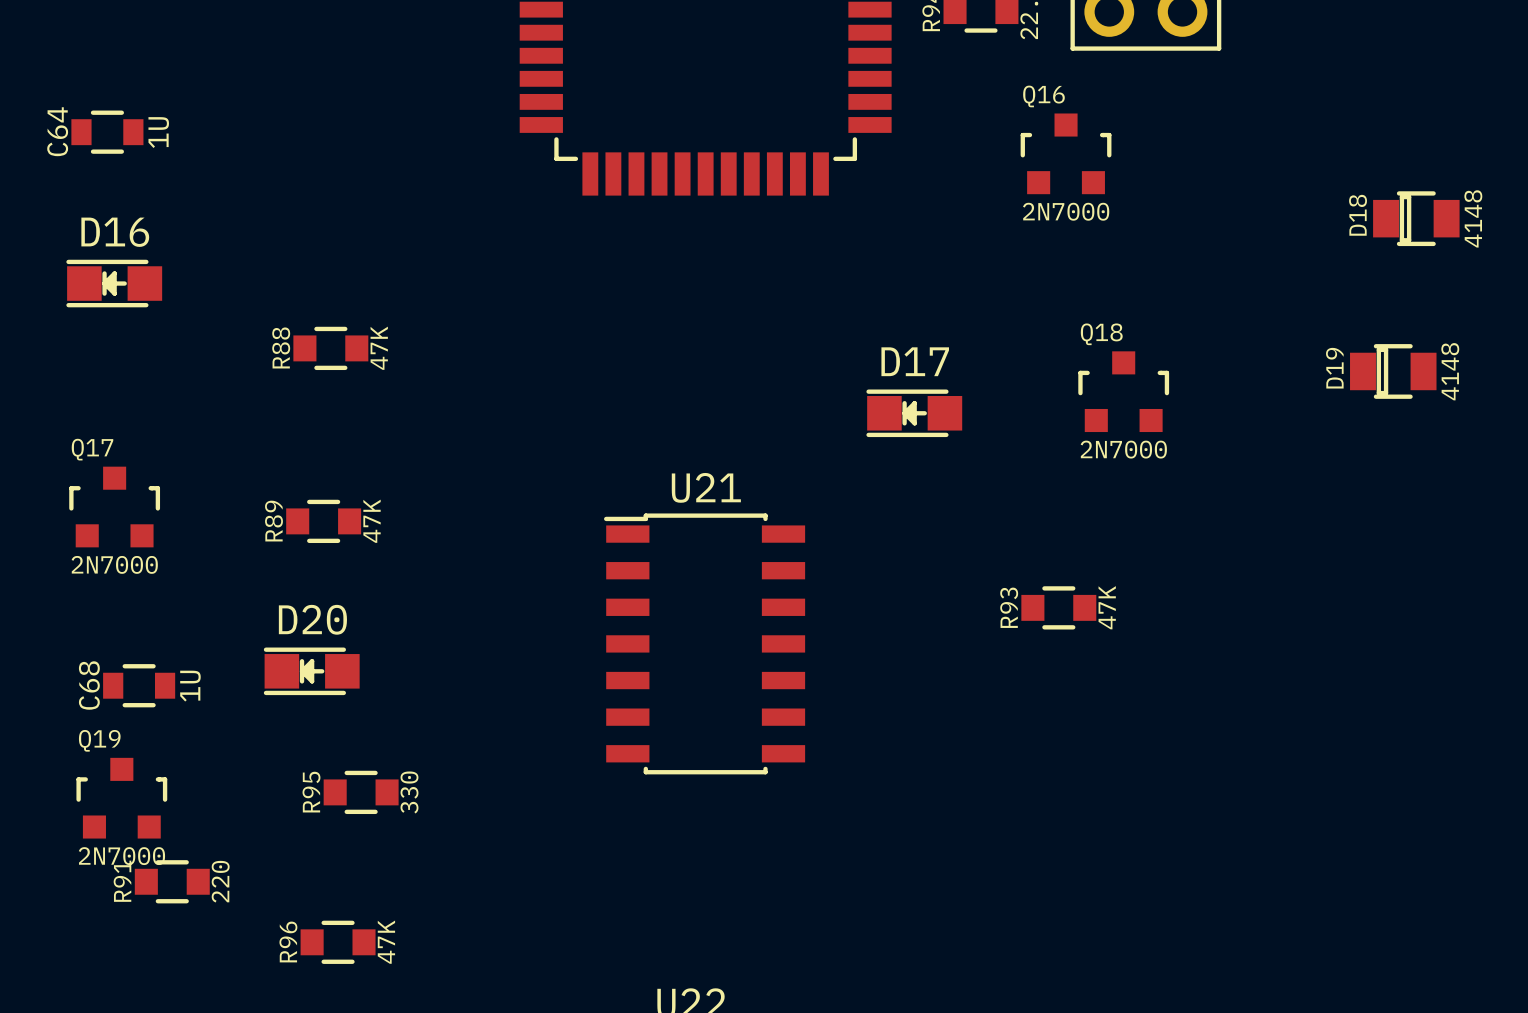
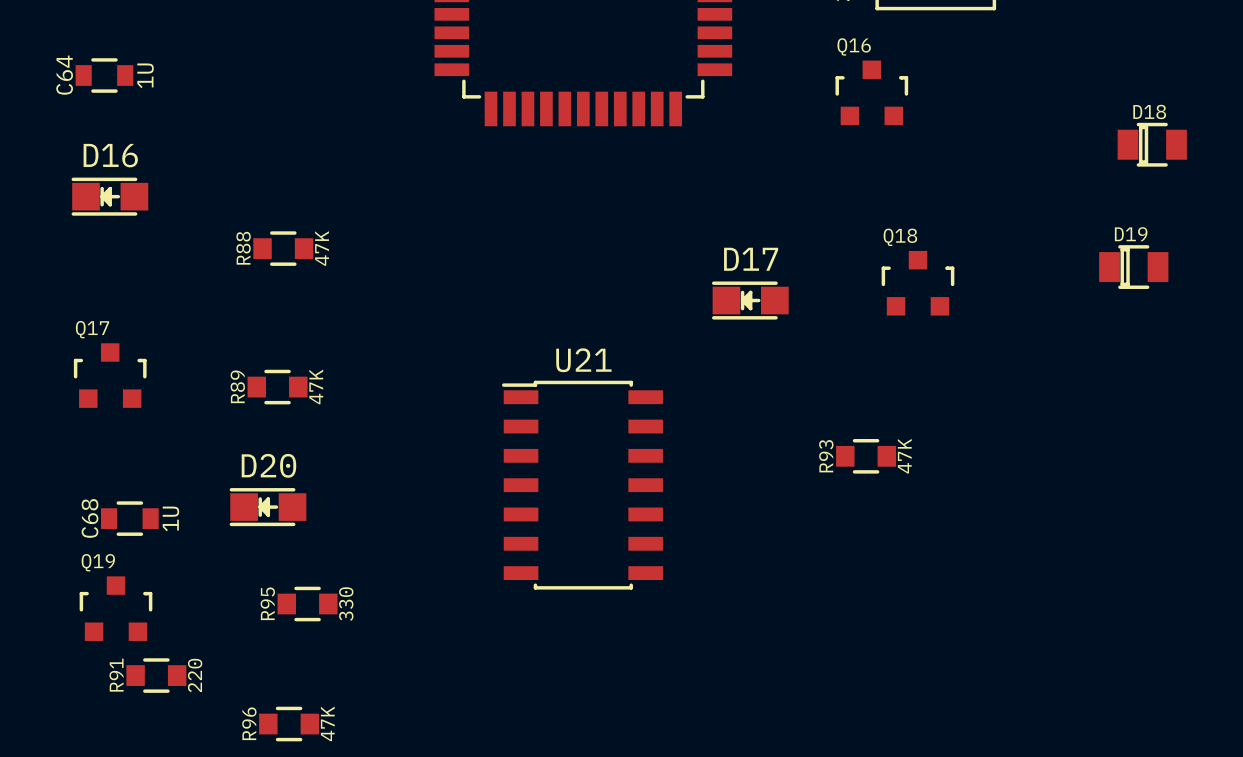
Q16 value: 2N7000 (1066, 211) -> none
D18 name rotation: 0° (1358, 215) -> 90° clockwise (1149, 111)
D18 name position: D18 (1358, 215) -> D18 (1149, 111)
D18 value: 4148 (1473, 218) -> none
D19 name rotation: 0° (1334, 368) -> 90° clockwise (1131, 234)
D19 name position: D19 (1334, 368) -> D19 (1131, 234)
D19 value: 4148 (1450, 371) -> none
Q18 value: 2N7000 (1123, 449) -> none
Q17 value: 2N7000 (114, 564) -> none
Q19 value: 2N7000 (121, 856) -> none

